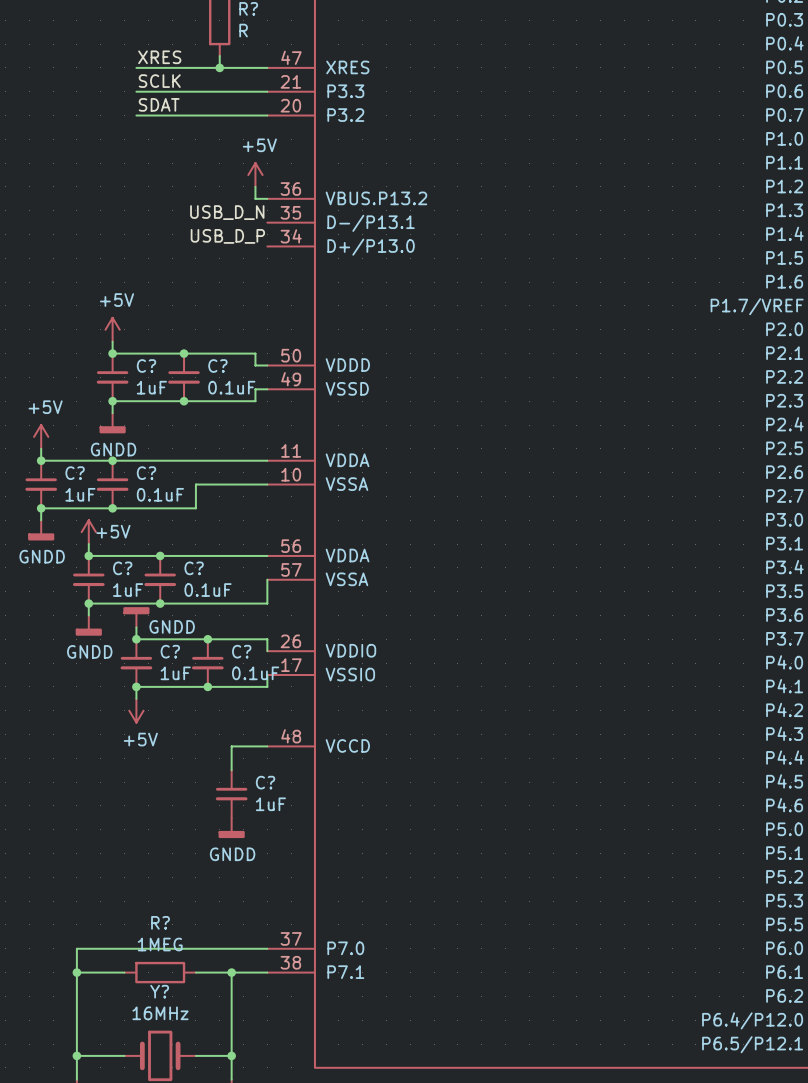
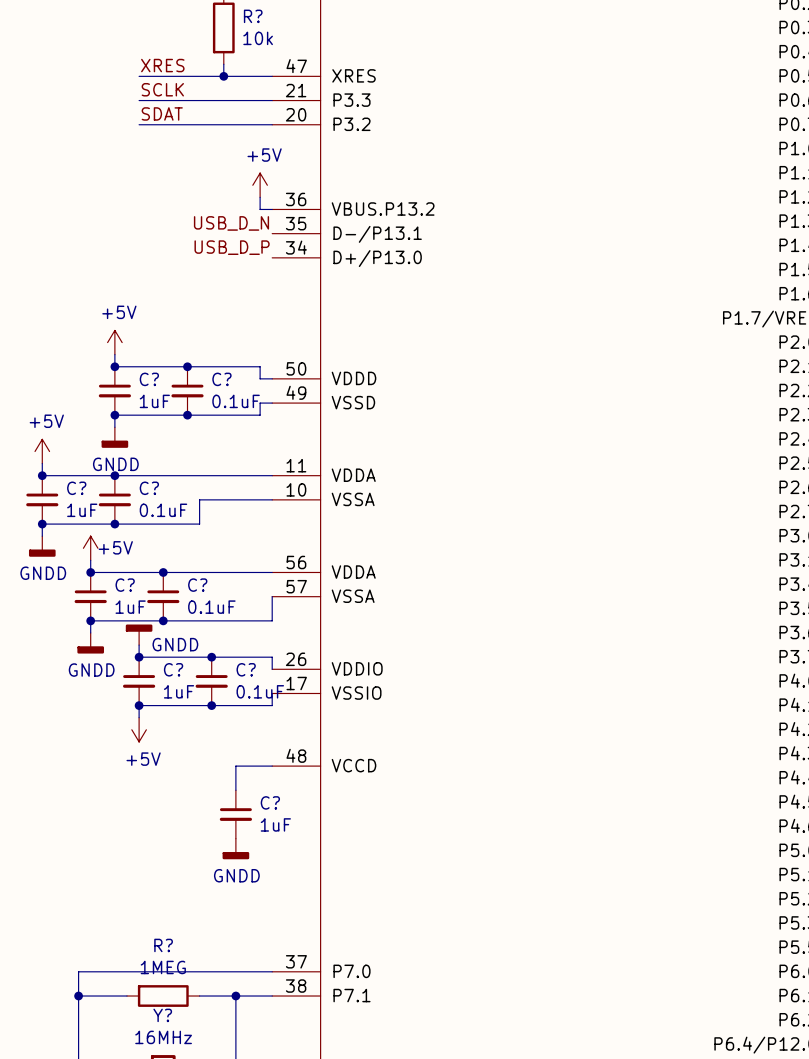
R? value: R (243, 30) -> 10k (258, 38)

